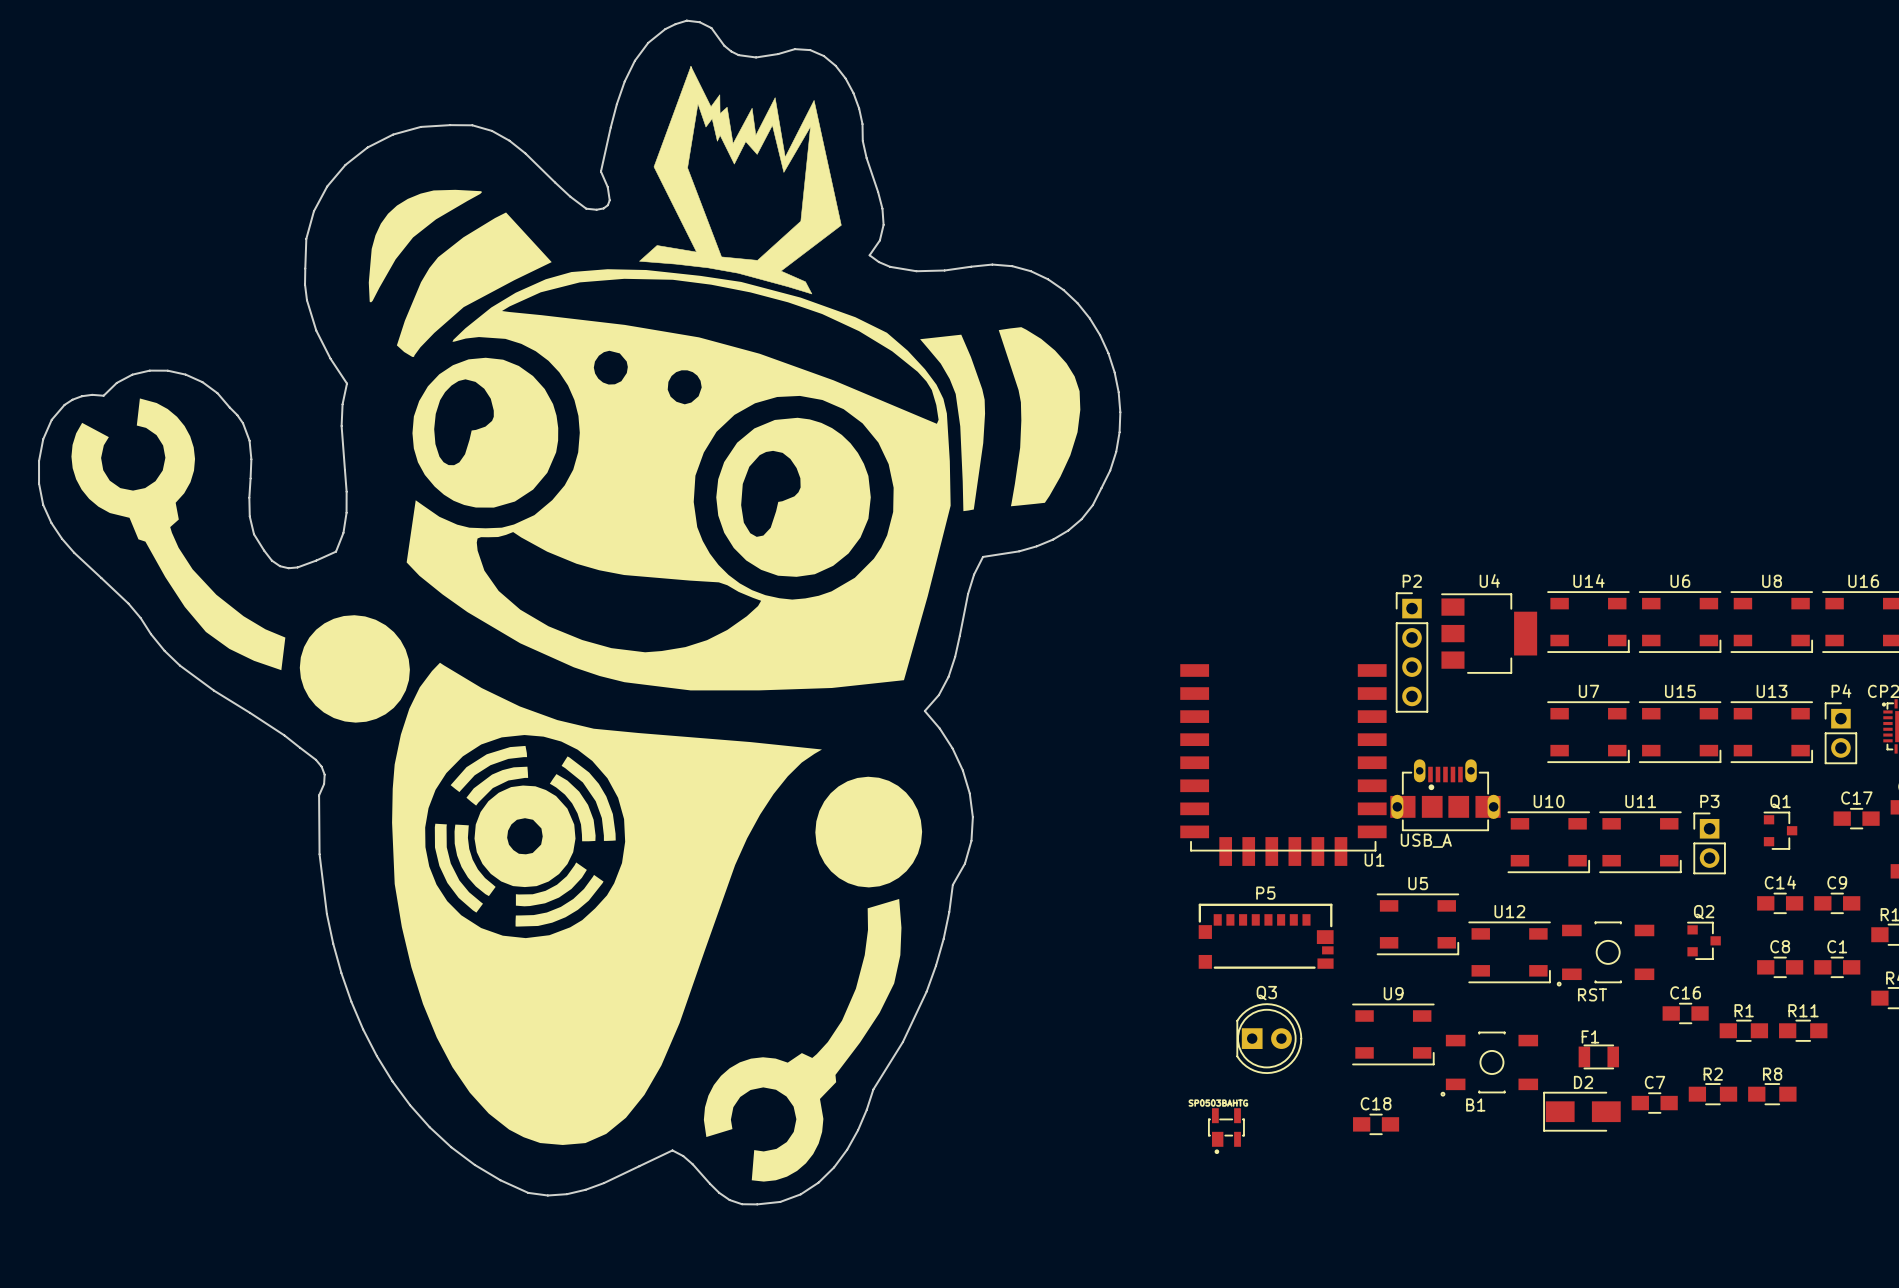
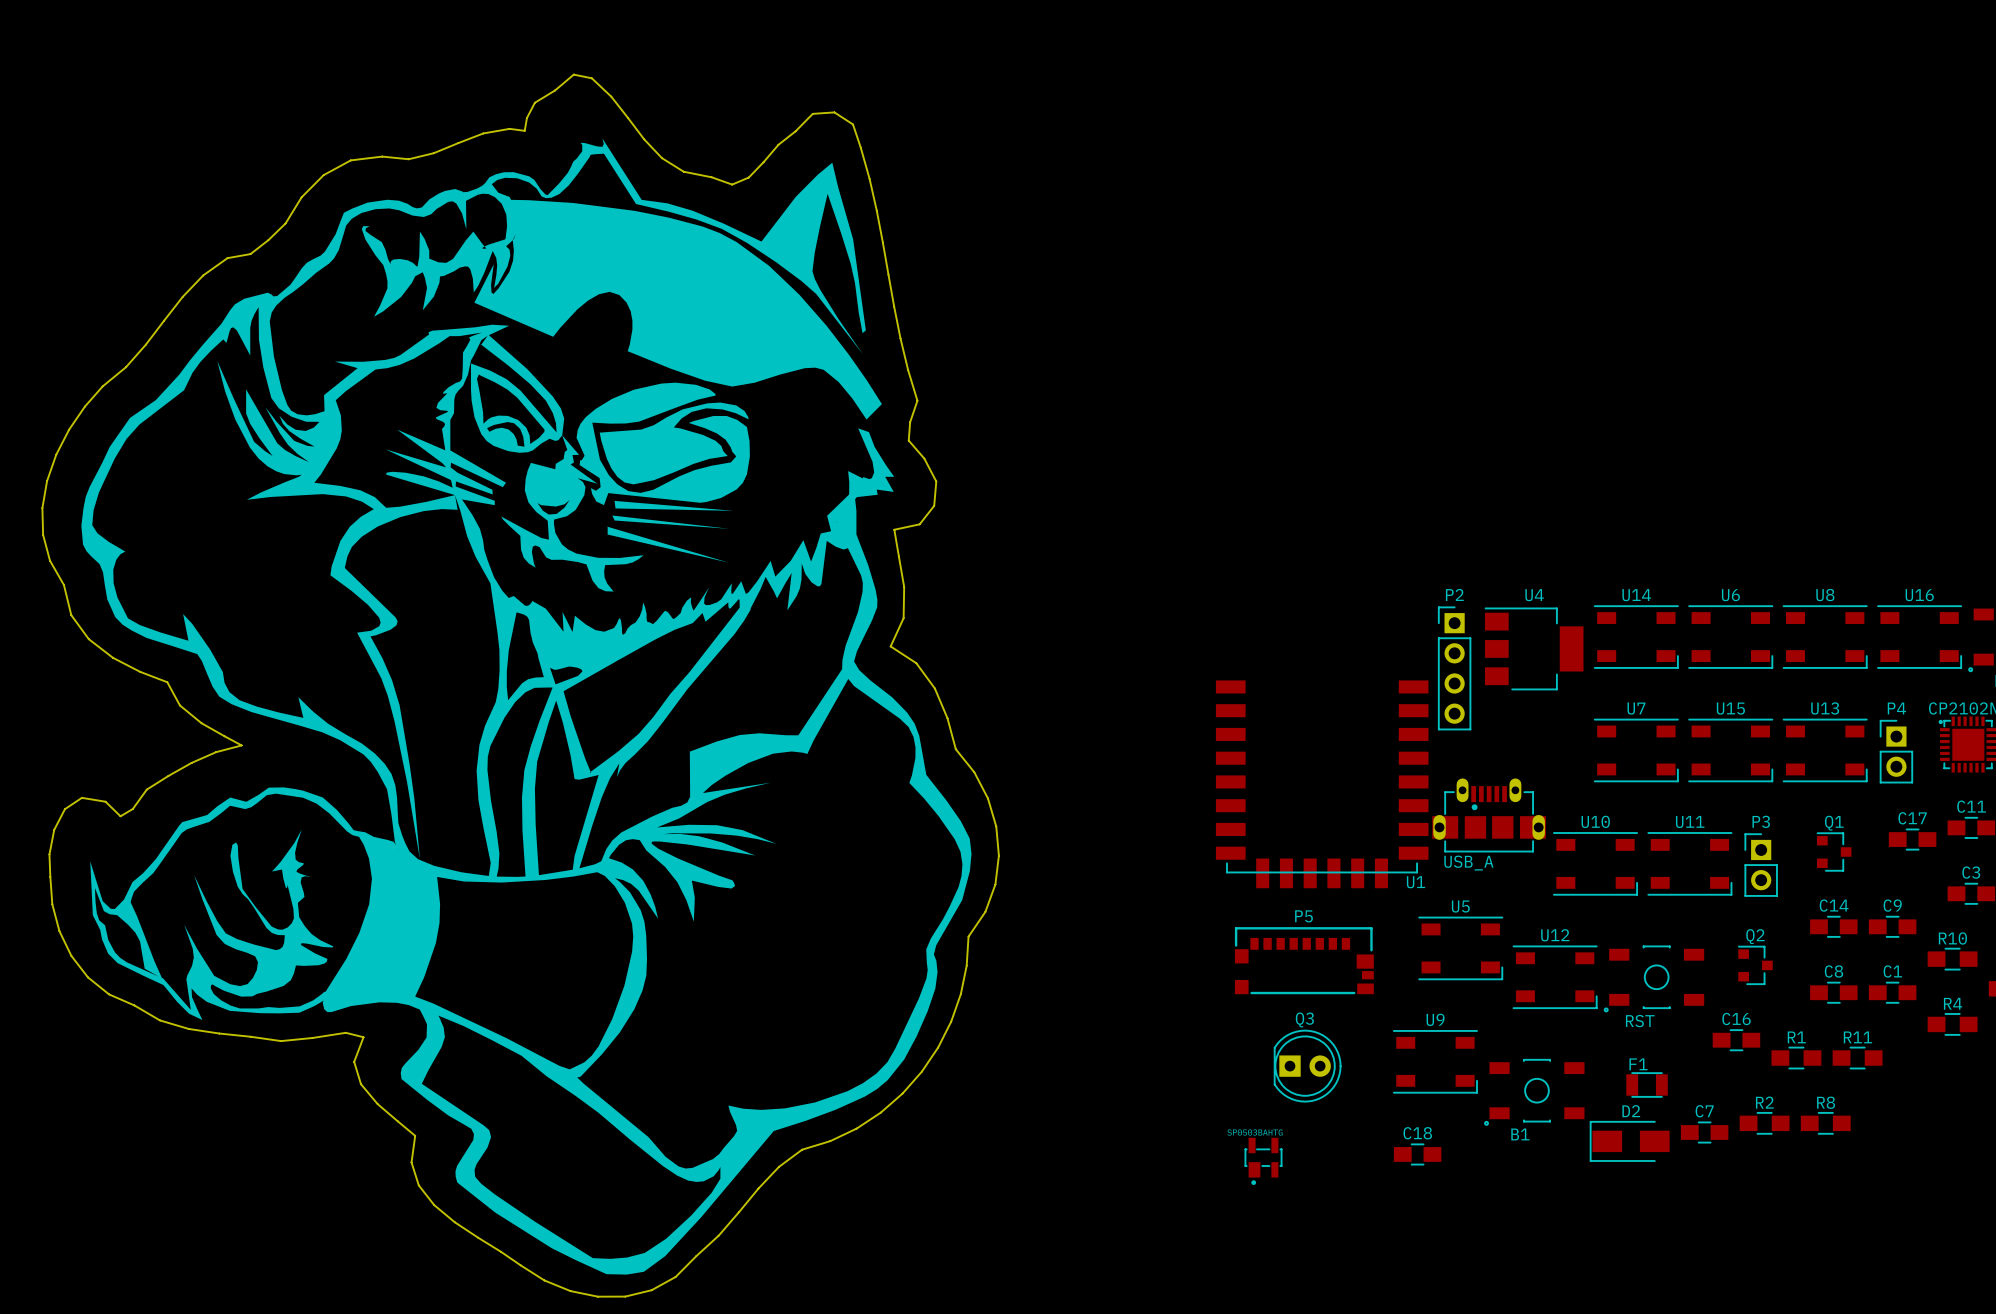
drawing: [38, 19, 1122, 1206] -> none
drawing: none -> [42, 74, 1000, 1298]

